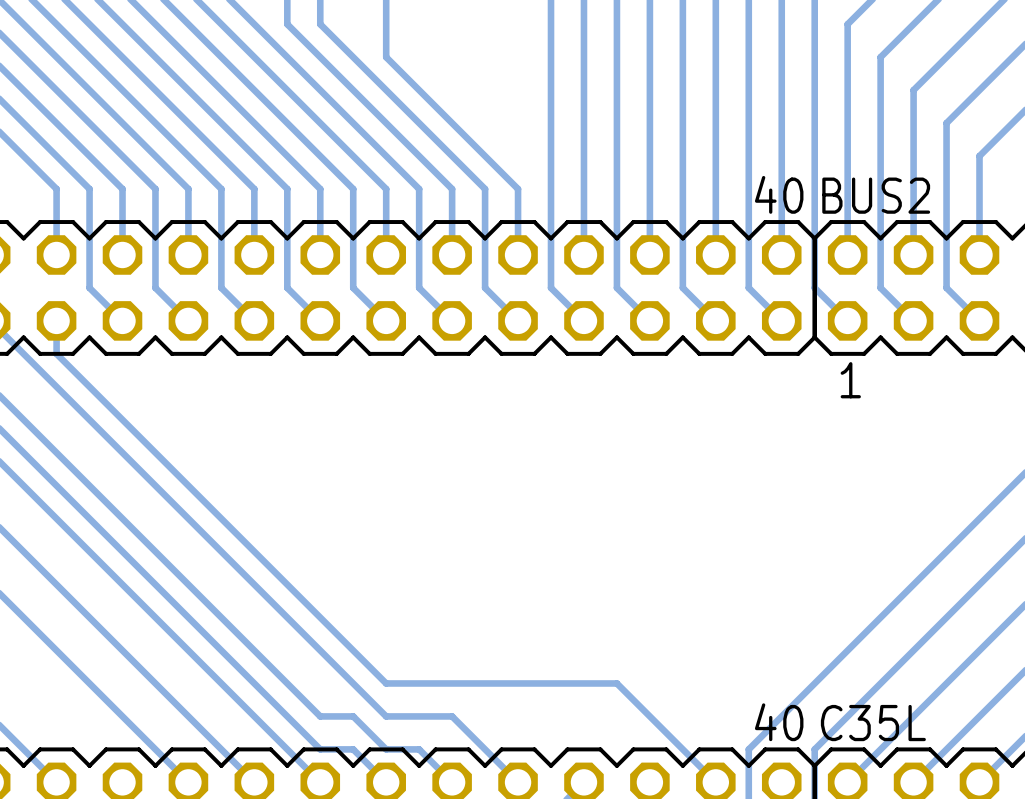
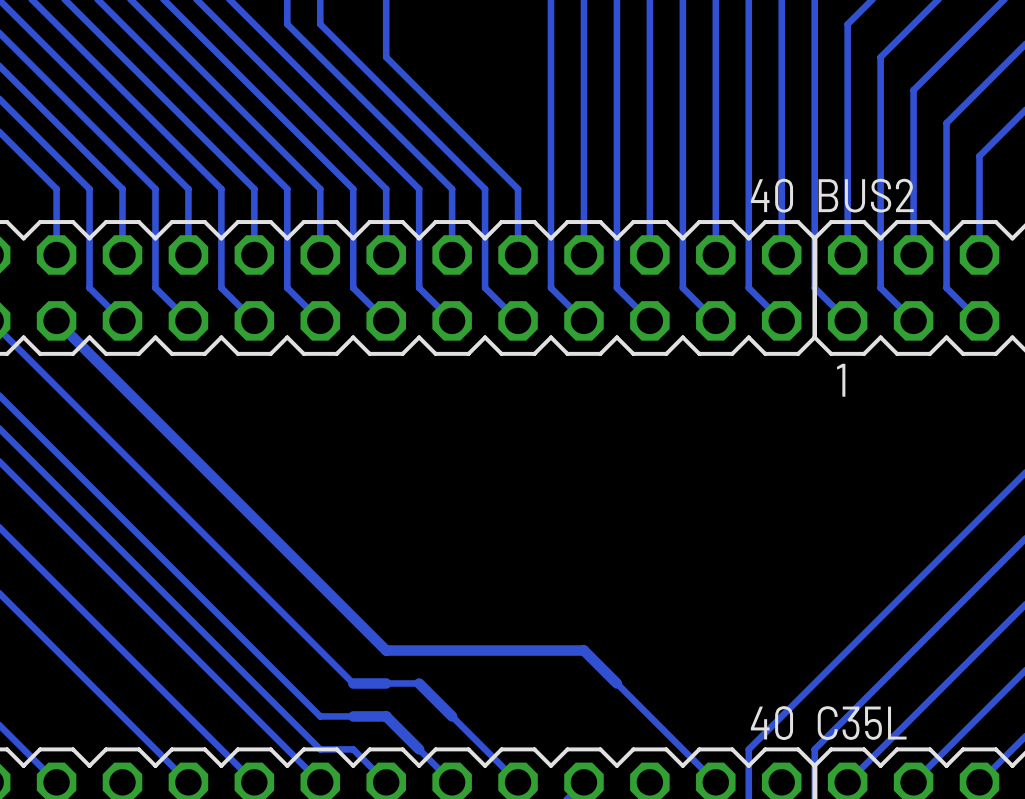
bottom track: (56, 320) (56, 353) (386, 683) -> (56, 320) (386, 650) (583, 650) (616, 683)
bottom track: (353, 683) (386, 716) (452, 716) -> (419, 683) (452, 716)
bottom track: none -> (353, 683) (386, 683)
bottom track: (419, 683) (616, 683) -> none
bottom track: (353, 716) (386, 749) (419, 749) -> (353, 716) (386, 716) (419, 749)

